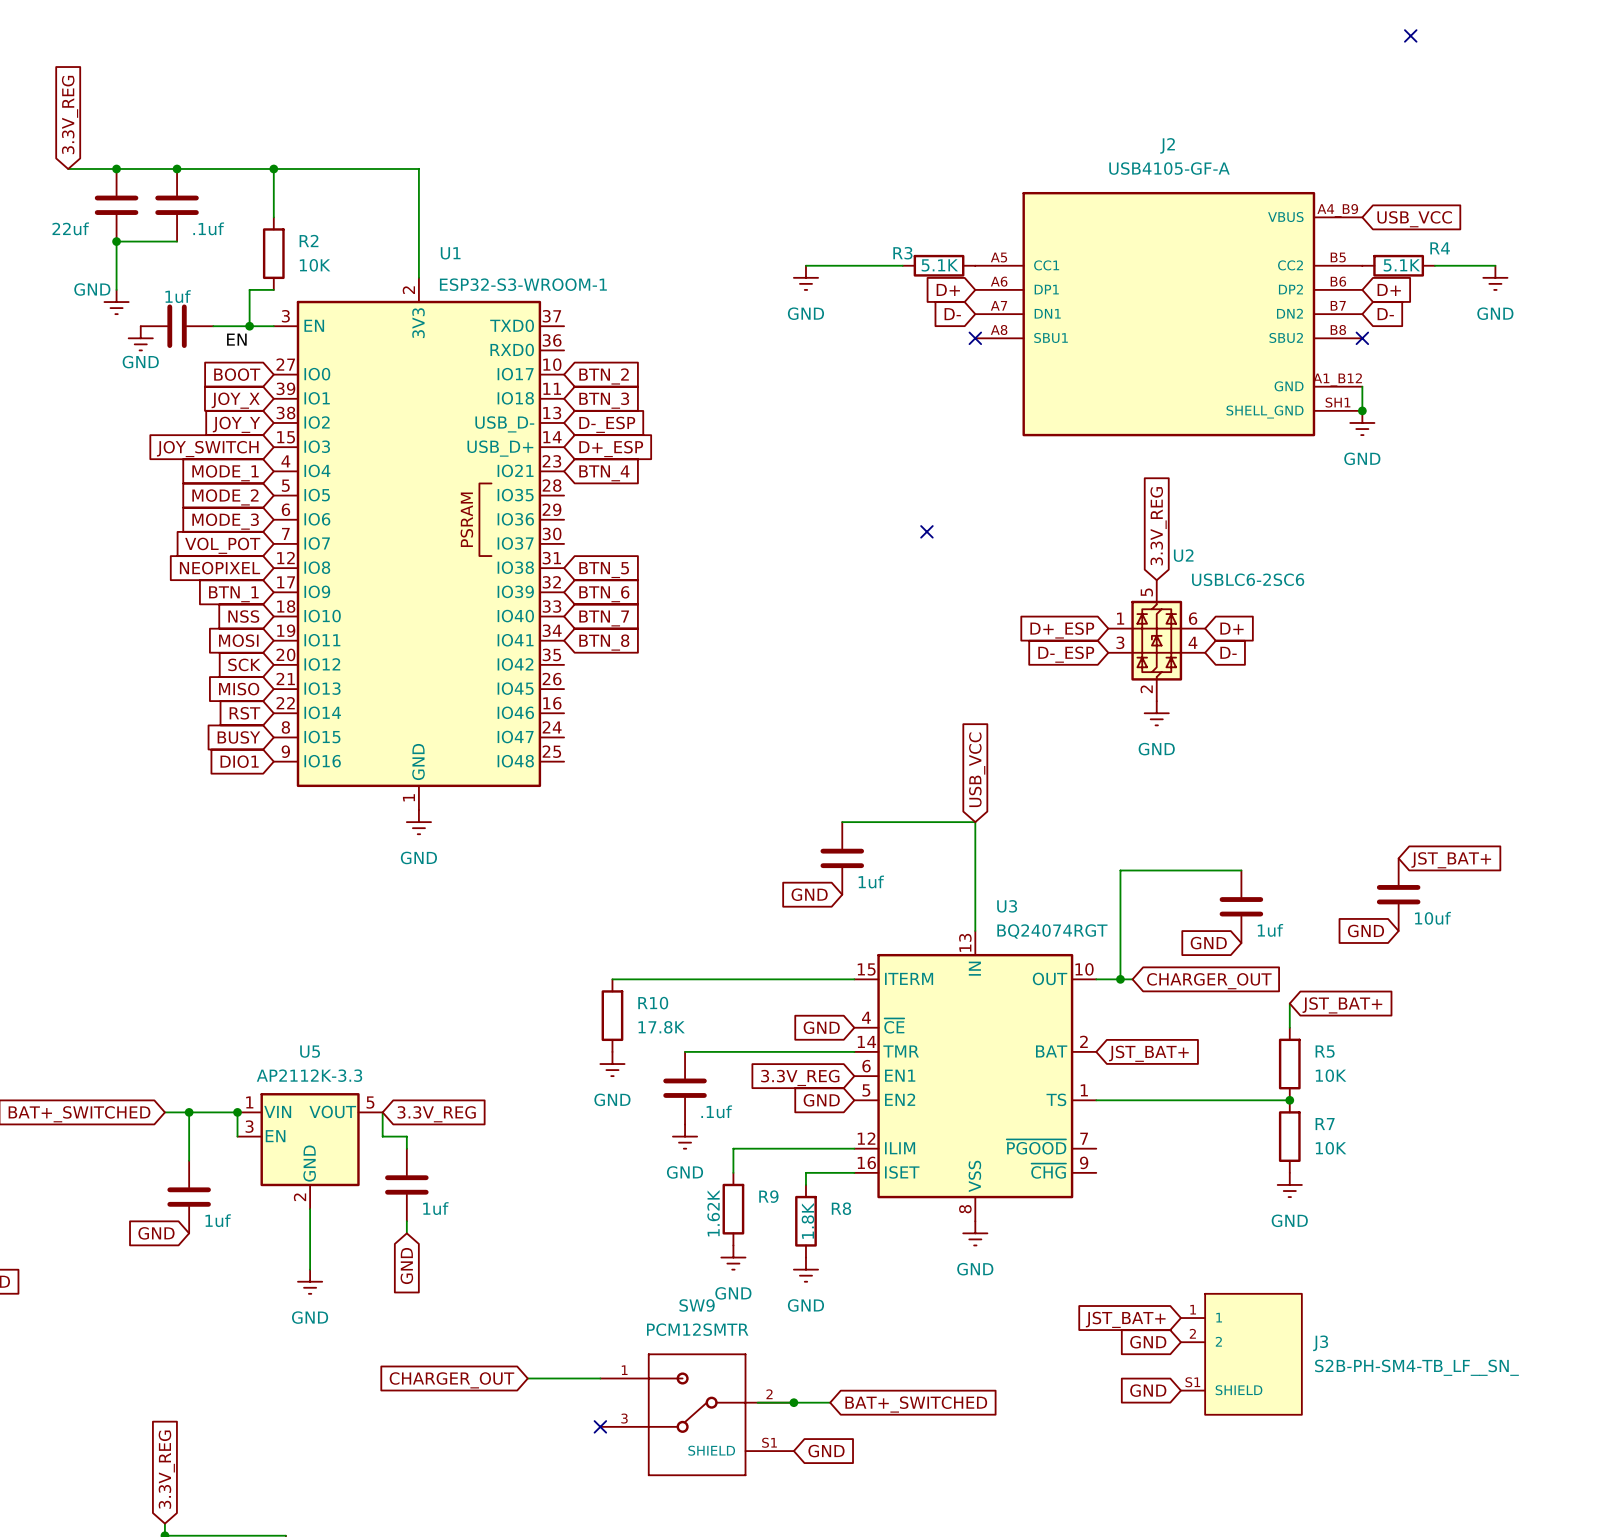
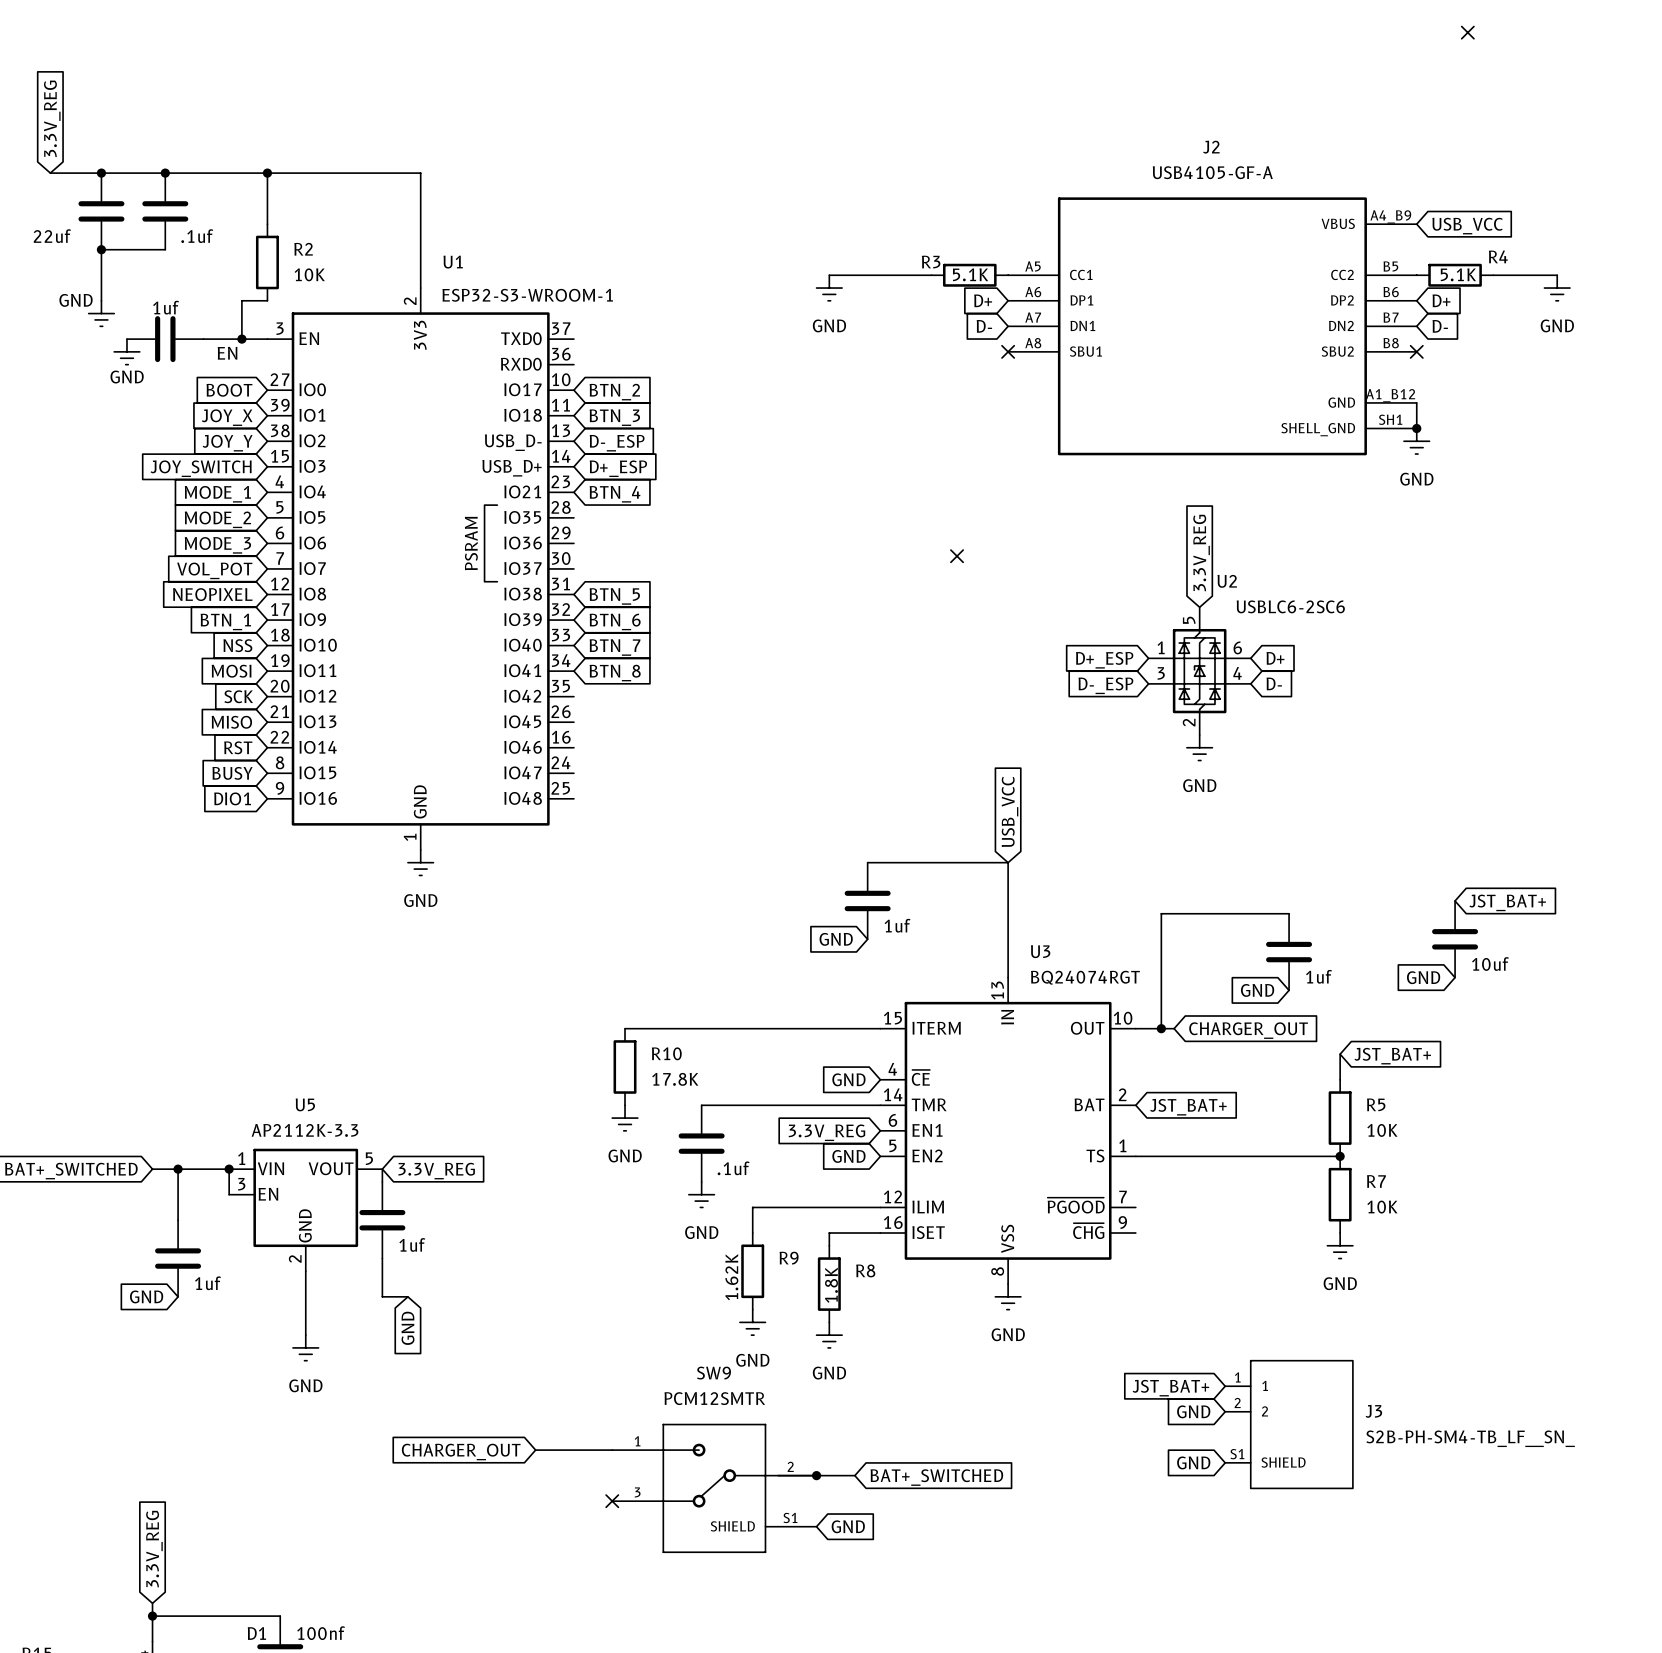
wire: (382, 1124) (382, 1136) (406, 1136) (406, 1148) -> none
part position: (406, 1184) -> (382, 1220)
wire: (406, 1221) (406, 1233) -> (382, 1258) (382, 1296) (407, 1296)

